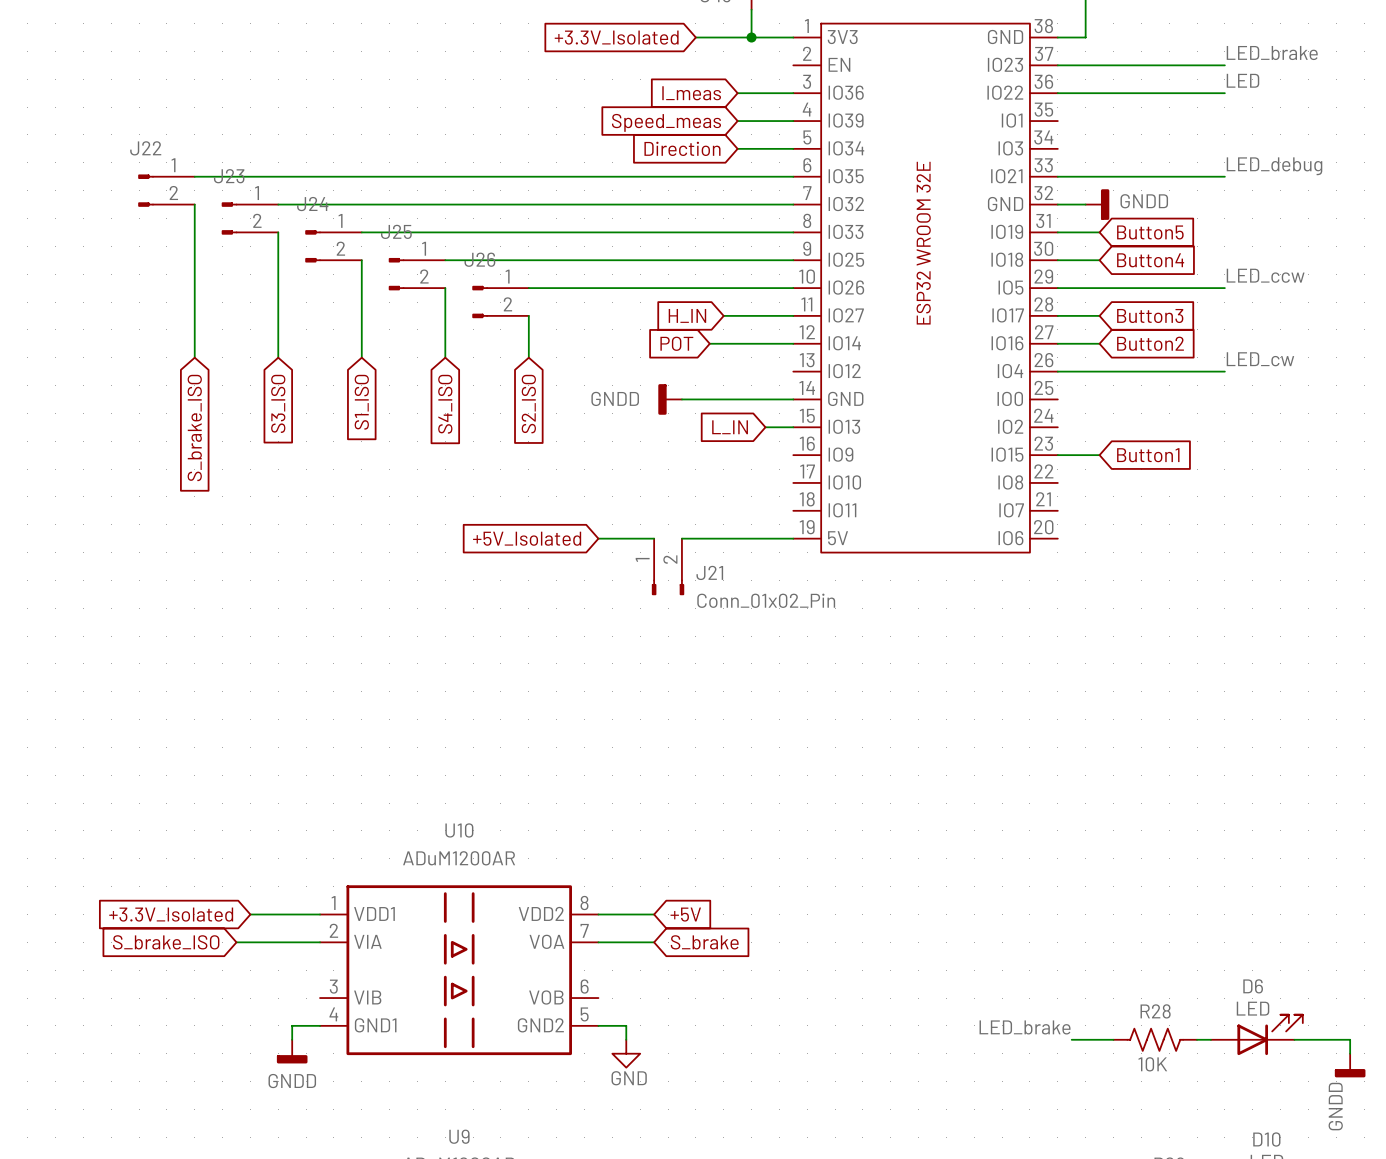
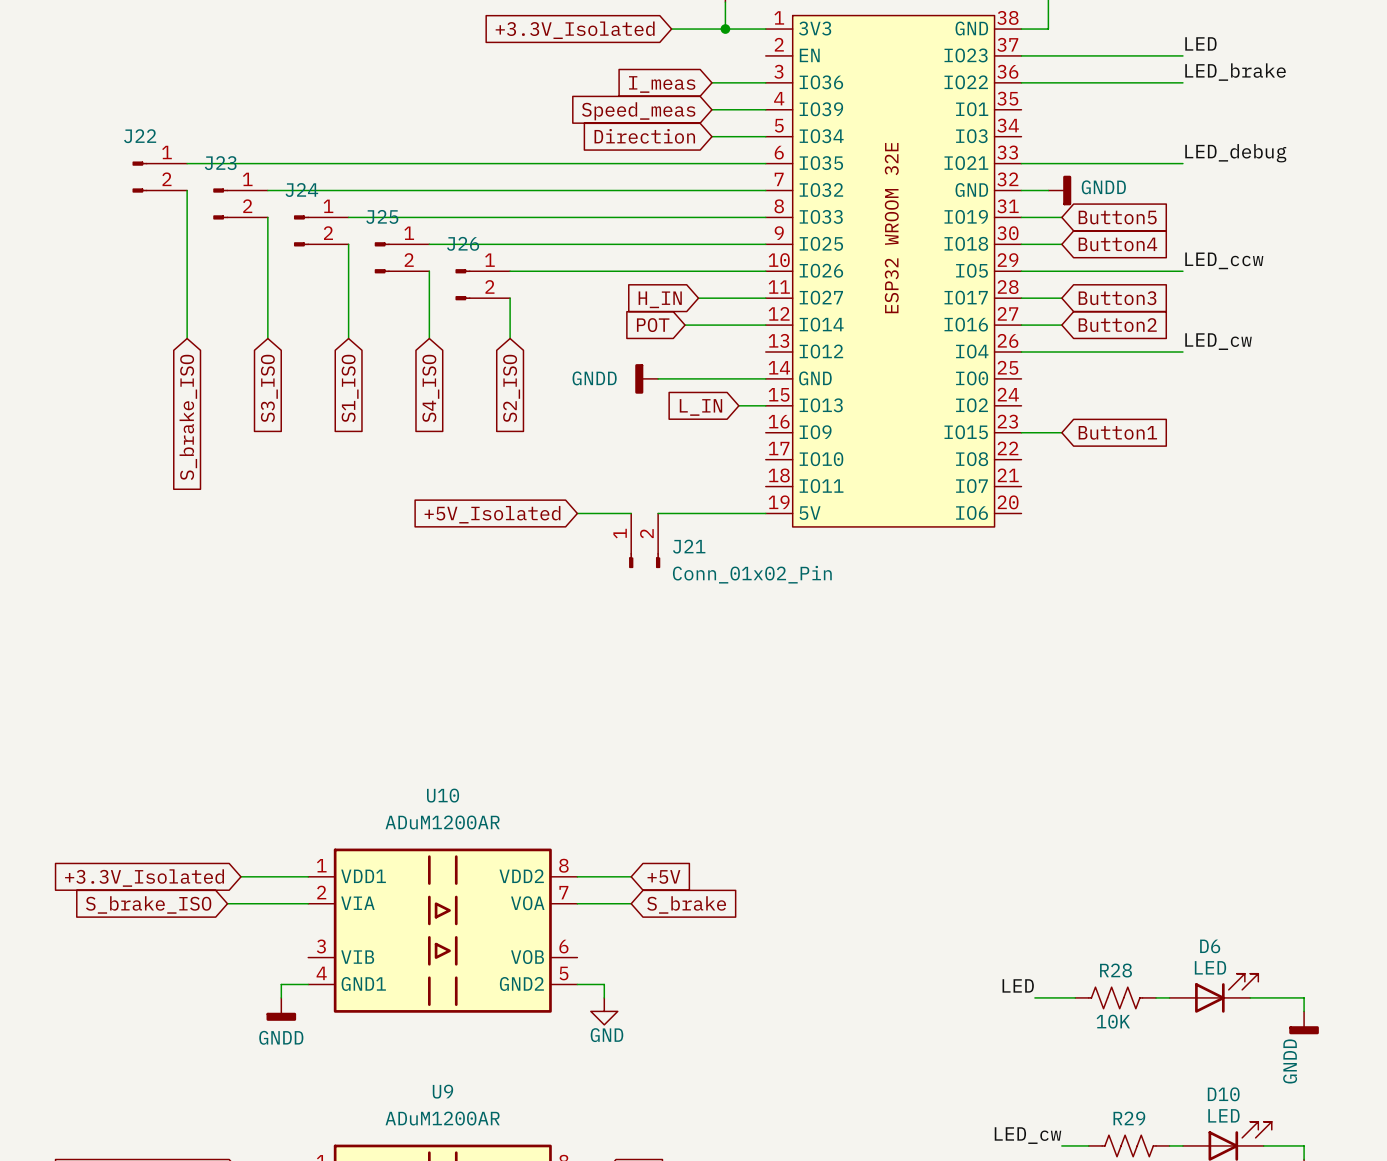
label: LED_brake (1272, 53) -> LED (1200, 43)
label: LED (1242, 80) -> LED_brake (1235, 72)
label: LED_brake (1025, 1027) -> LED (1018, 985)

